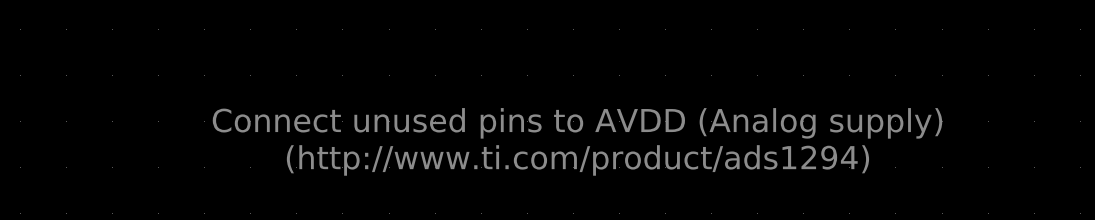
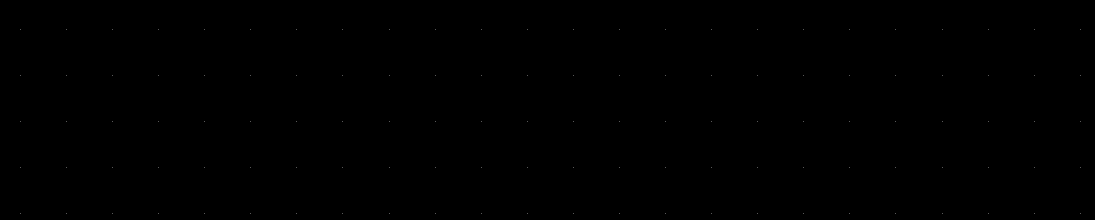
text: Connect unused pins to AVDD (Analog supply) (577, 123) -> none
text: (http://www.ti.com/product/ads1294) (577, 160) -> none

